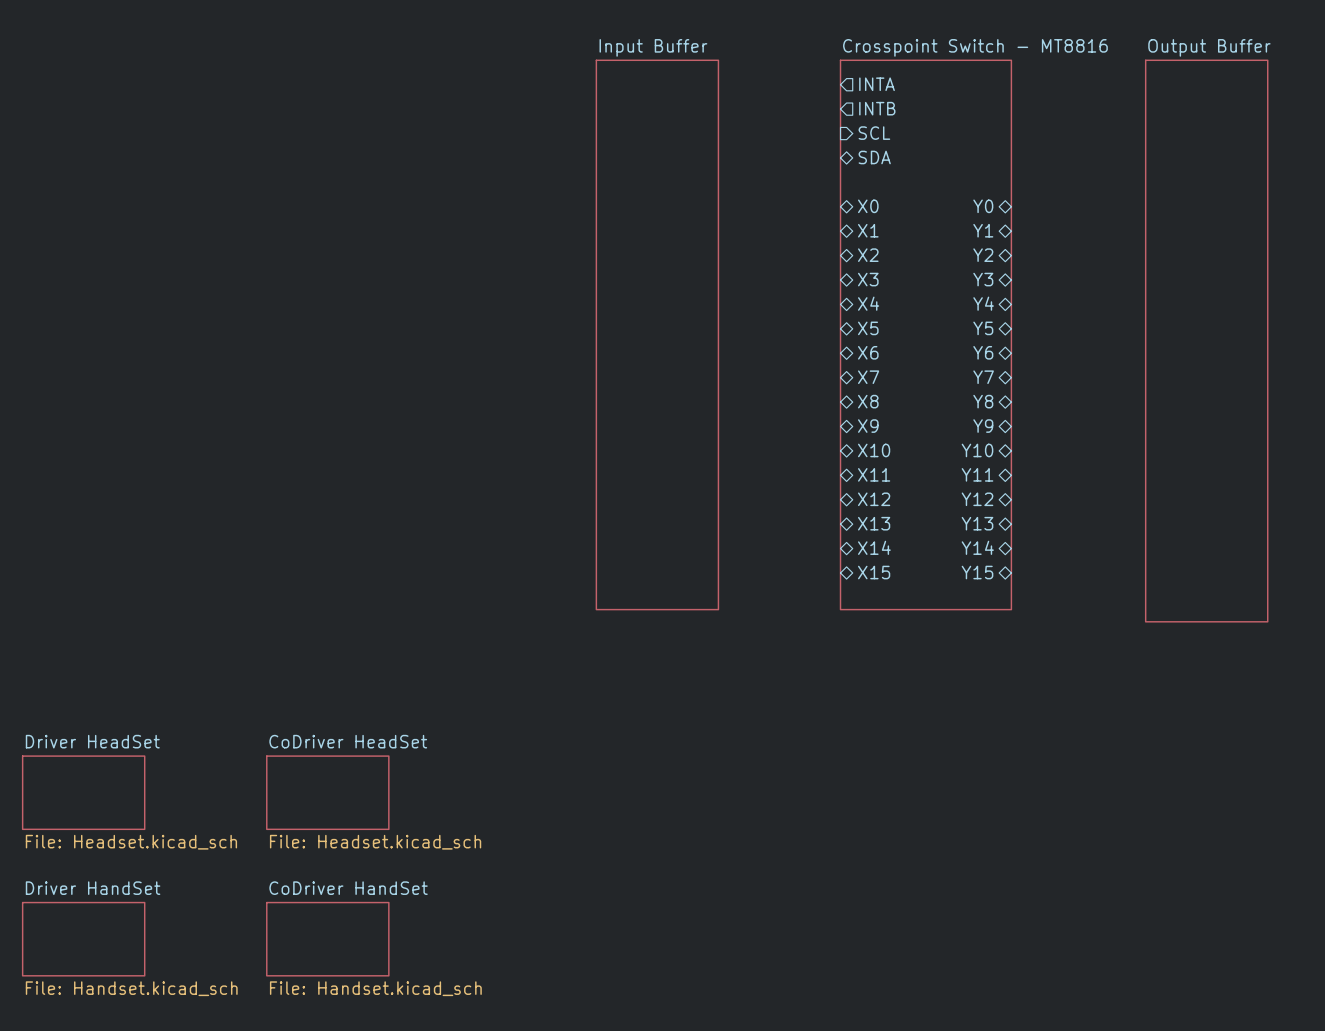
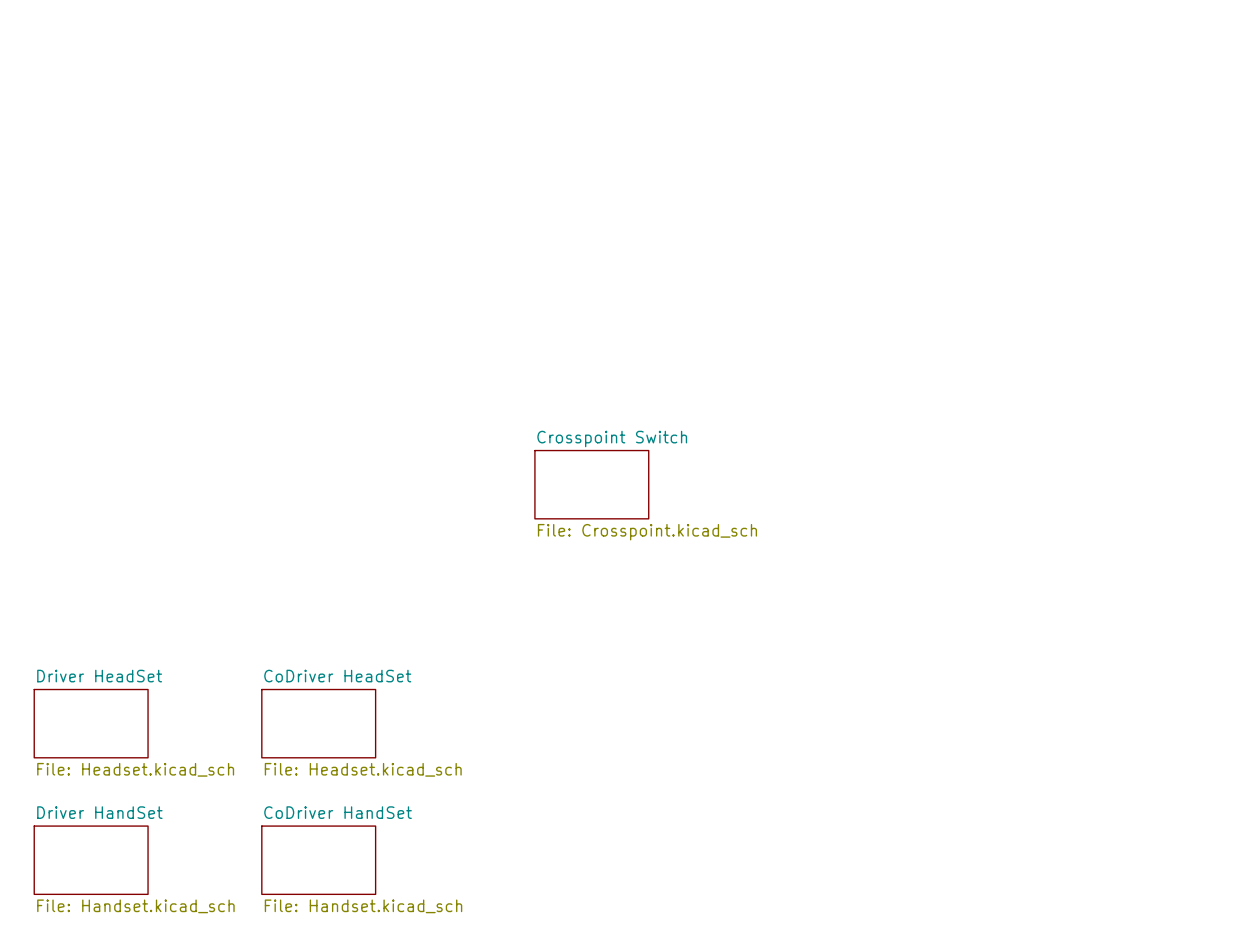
sheet pin: INTA (877, 84) -> none
sheet pin: INTB (877, 108) -> none
sheet pin: SCL (874, 133) -> none
sheet pin: SDA (874, 157) -> none
sheet pin: X0 (868, 206) -> none
sheet pin: Y0 (983, 206) -> none
sheet pin: X1 (868, 230) -> none
sheet pin: Y1 (983, 230) -> none
sheet pin: X2 (868, 255) -> none
sheet pin: Y2 (983, 255) -> none
sheet pin: X3 (868, 279) -> none
sheet pin: Y3 (983, 279) -> none
sheet pin: X4 (868, 303) -> none
sheet pin: Y4 (983, 303) -> none
sheet pin: X5 (868, 328) -> none
sheet pin: Y5 (983, 328) -> none
sheet Input Buffer: (657, 334) -> none
sheet Crosspoint Switch - MT8816: (925, 334) -> none
sheet Output Buffer: (1206, 341) -> none
sheet pin: X6 (868, 352) -> none
sheet pin: Y6 (983, 352) -> none
sheet pin: X7 (868, 377) -> none
sheet pin: Y7 (983, 377) -> none
sheet pin: X8 (868, 401) -> none
sheet pin: Y8 (983, 401) -> none
sheet pin: X9 (868, 426) -> none
sheet pin: Y9 (983, 426) -> none
sheet pin: X10 (874, 450) -> none
sheet pin: Y10 (977, 450) -> none
sheet pin: X11 (874, 474) -> none
sheet pin: Y11 (977, 474) -> none
sheet pin: X12 (874, 499) -> none
sheet pin: Y12 (977, 499) -> none
sheet pin: X13 (874, 523) -> none
sheet pin: Y13 (977, 523) -> none
sheet Crosspoint Switch: none -> File: Crosspoint.kicad_sch (591, 484)
sheet pin: X14 (874, 547) -> none
sheet pin: Y14 (977, 547) -> none
sheet pin: X15 (874, 572) -> none
sheet pin: Y15 (977, 572) -> none

